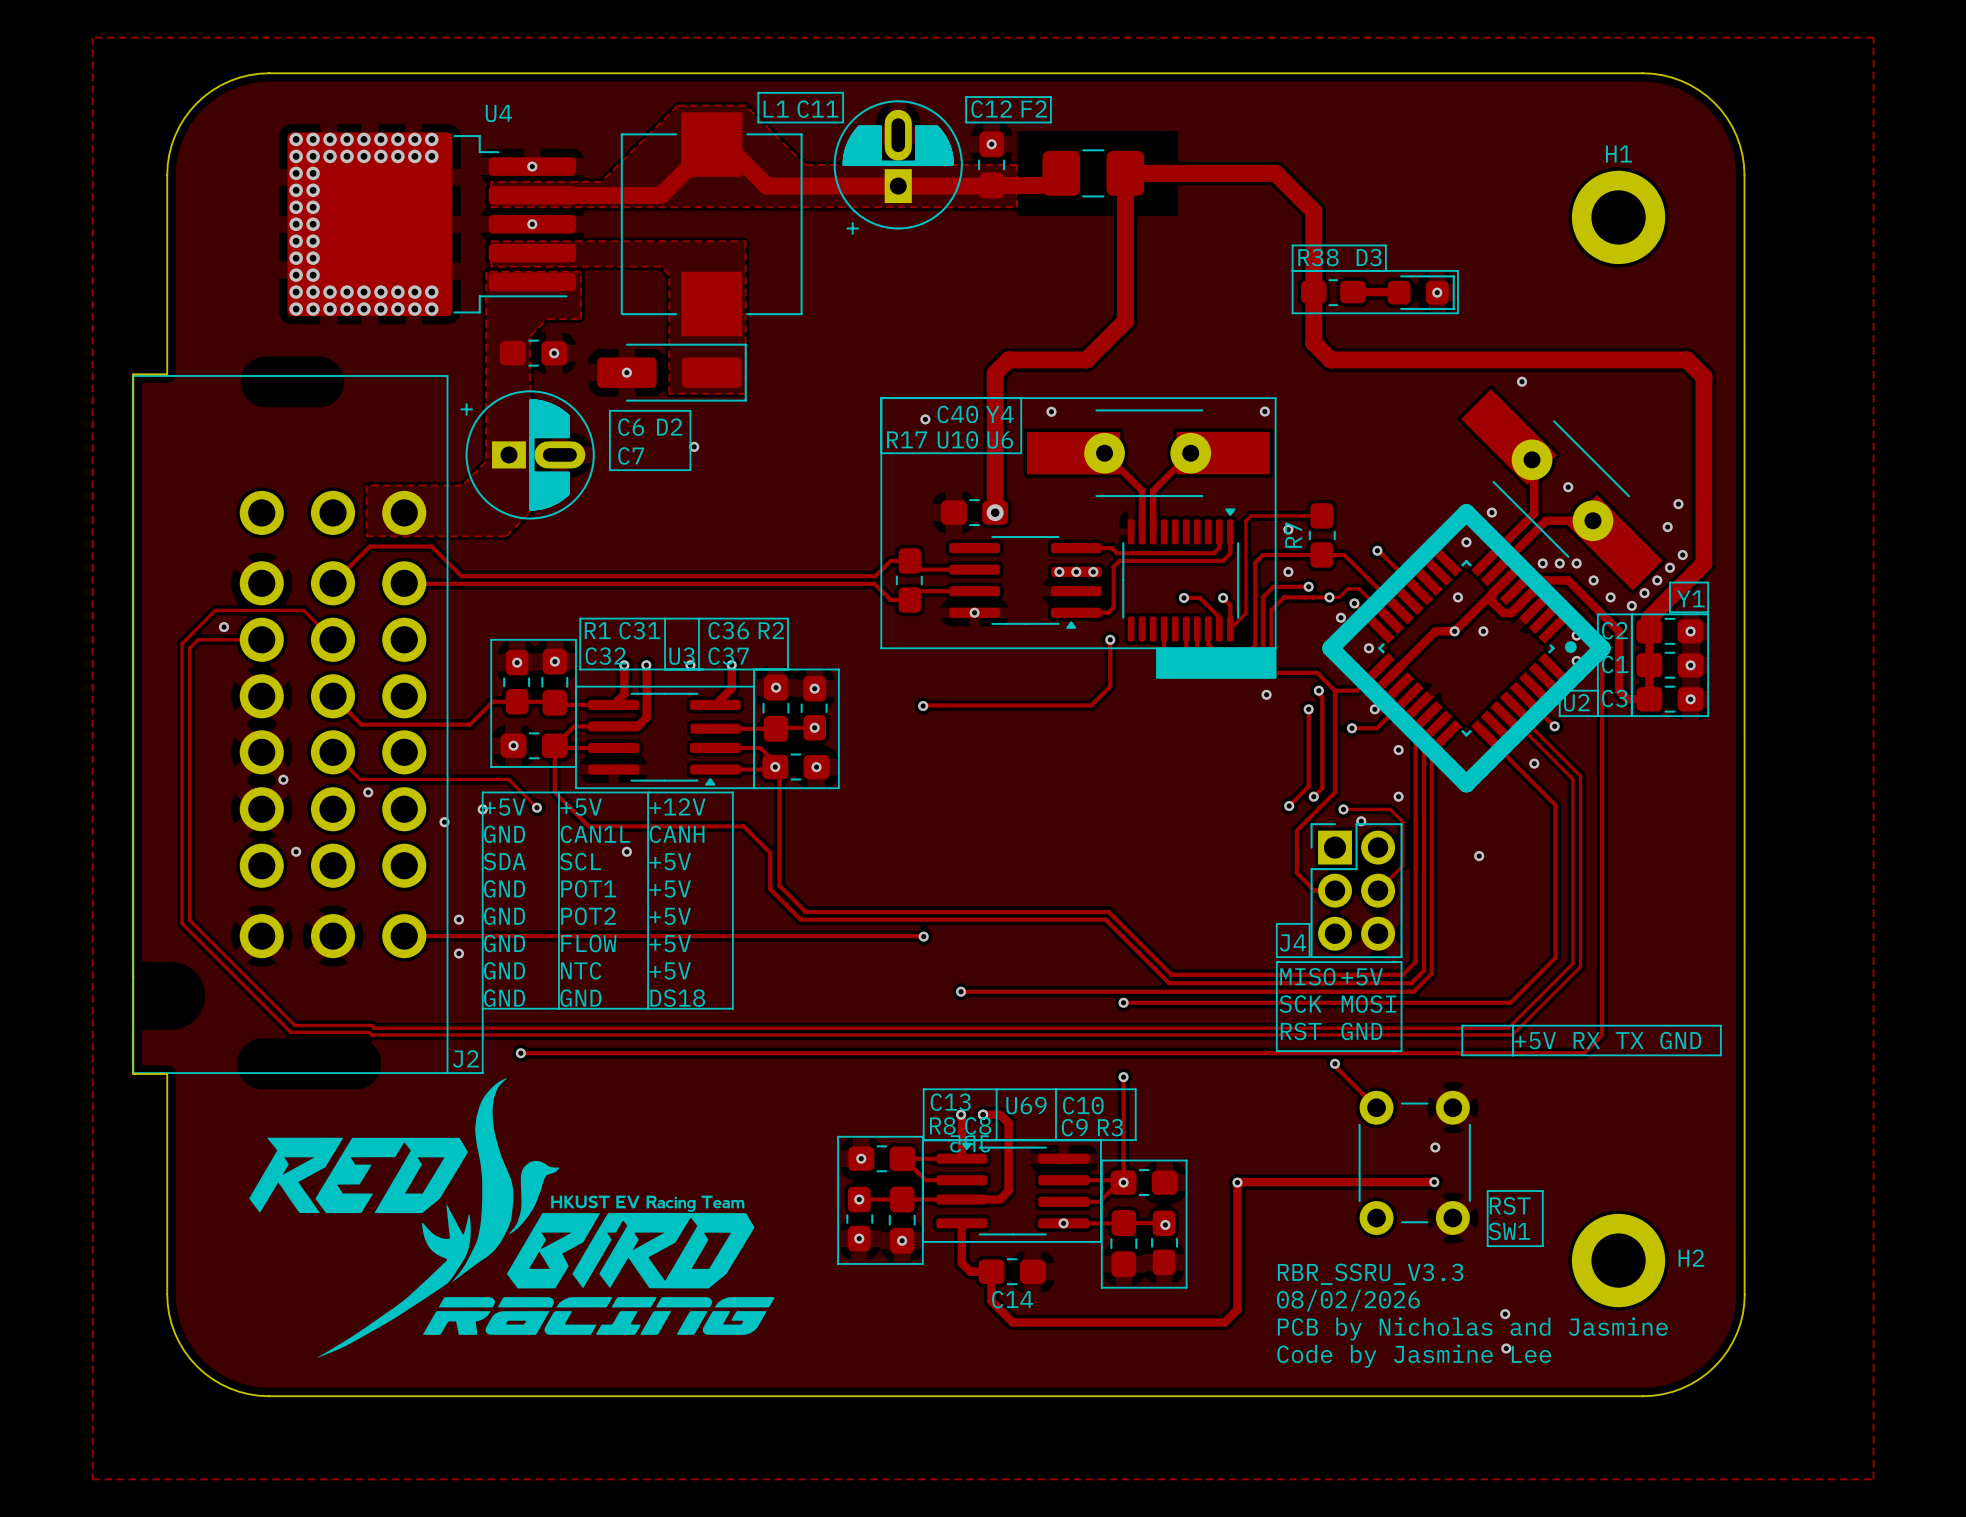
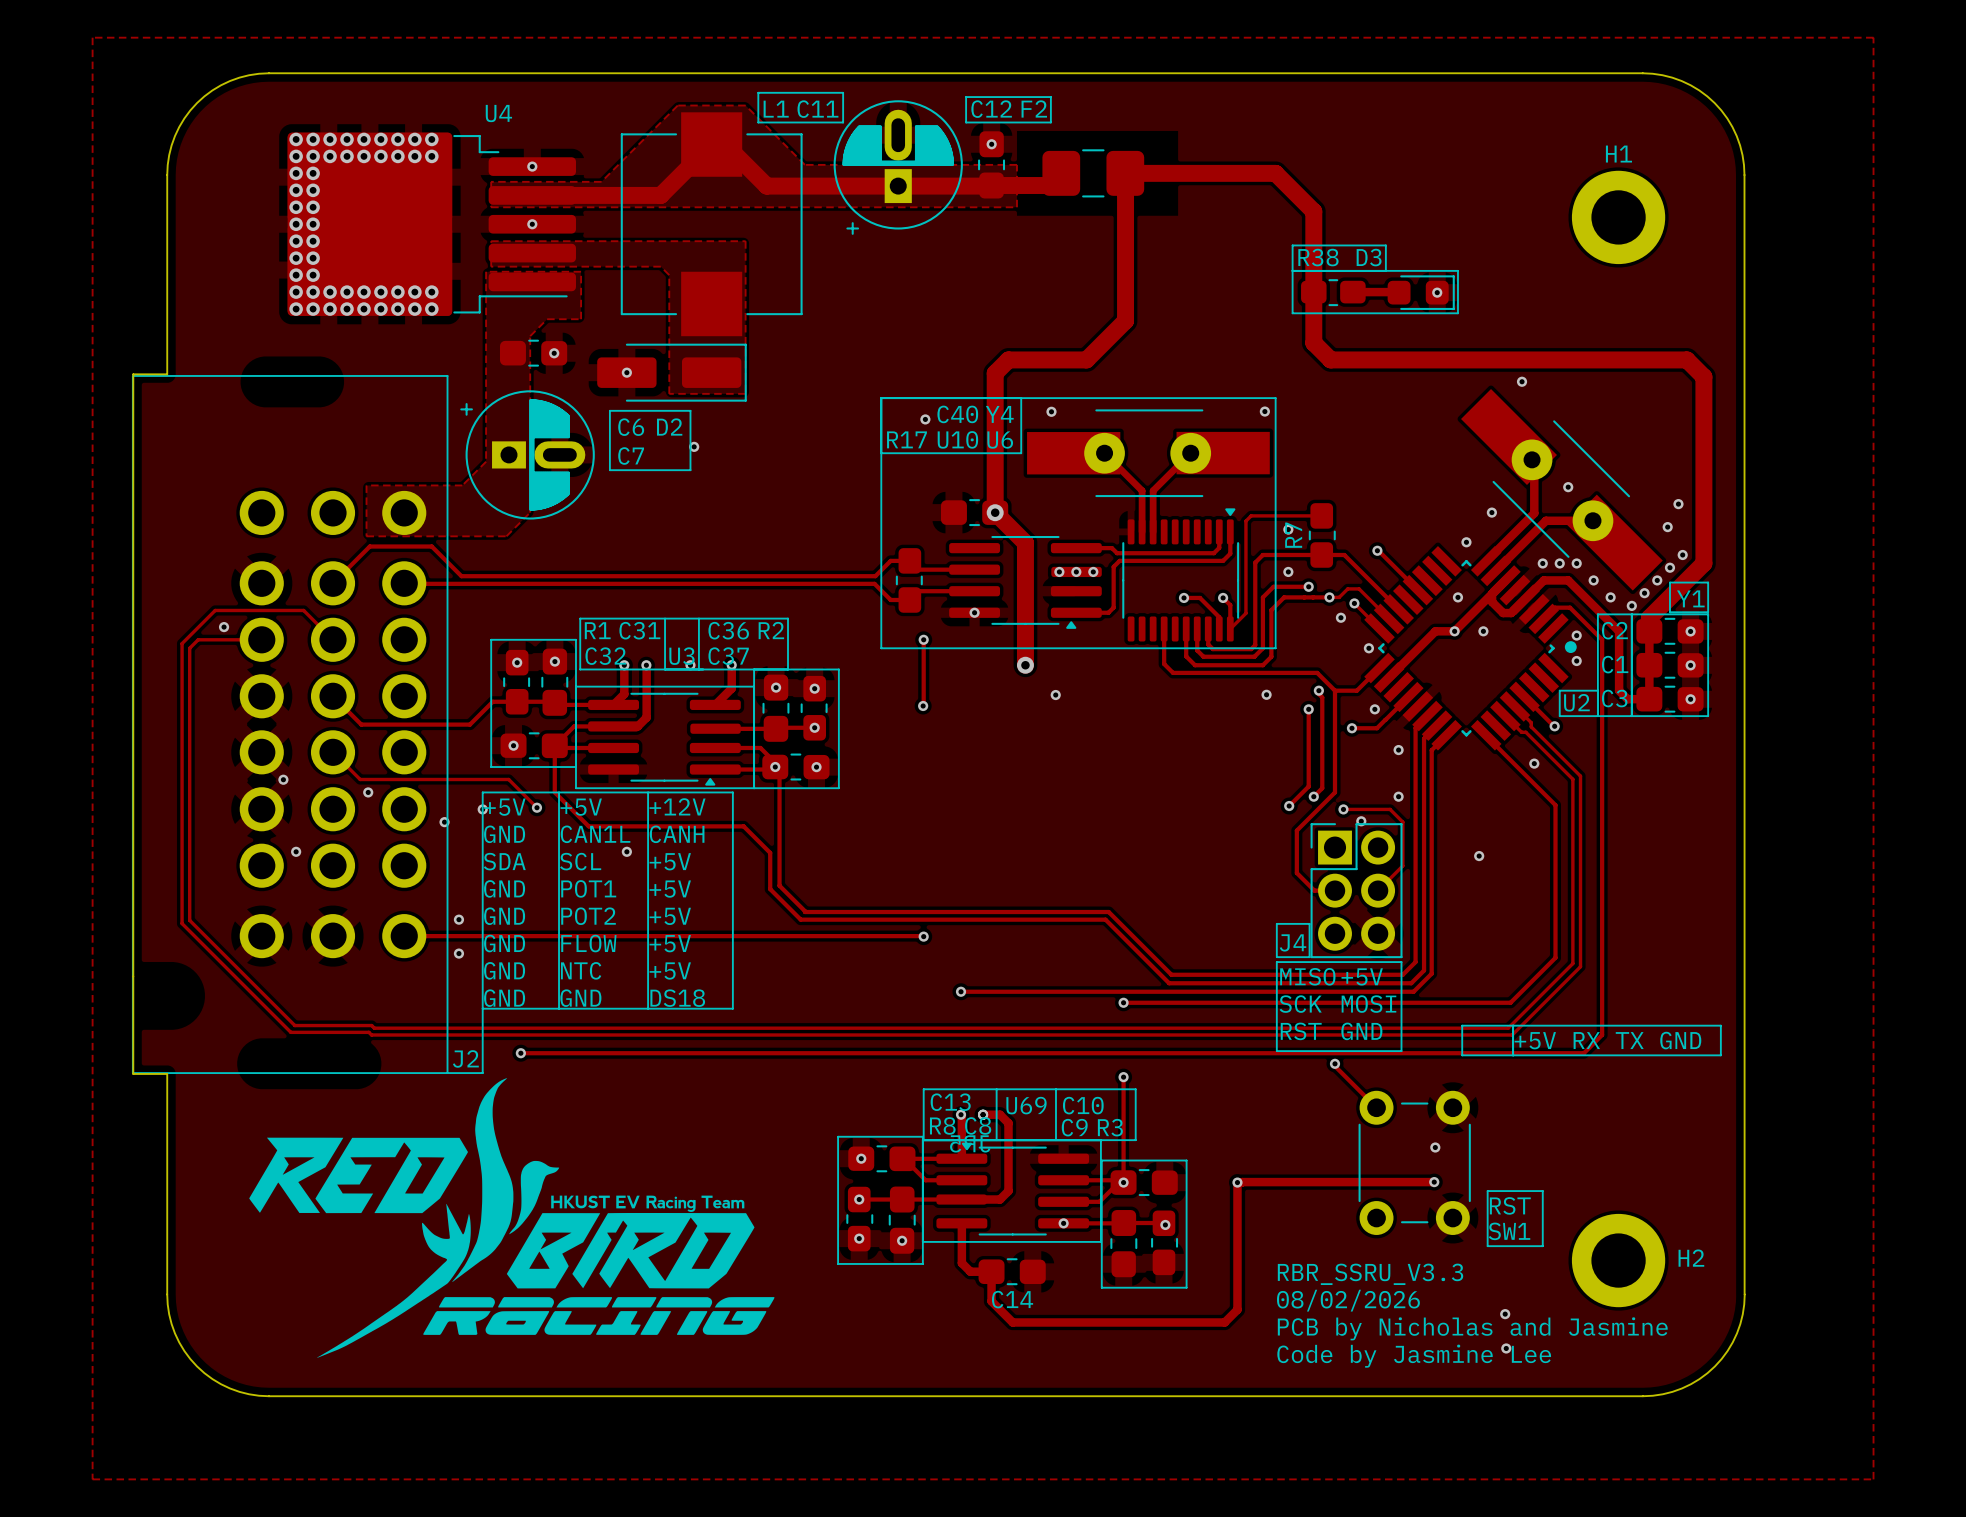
track: none -> (995, 512) (1025, 542) (1025, 665)
line: (1466, 512) (1602, 648) (1466, 783) (1330, 648) (1466, 512) -> none
via: none -> (923, 639)
track: (1110, 639) (1110, 686) (1091, 705) (923, 705) -> (923, 639) (923, 705)
via position: (1110, 639) -> (1055, 695)
drawing: [1156, 647, 1277, 679] -> none
via: none -> (1025, 665)

